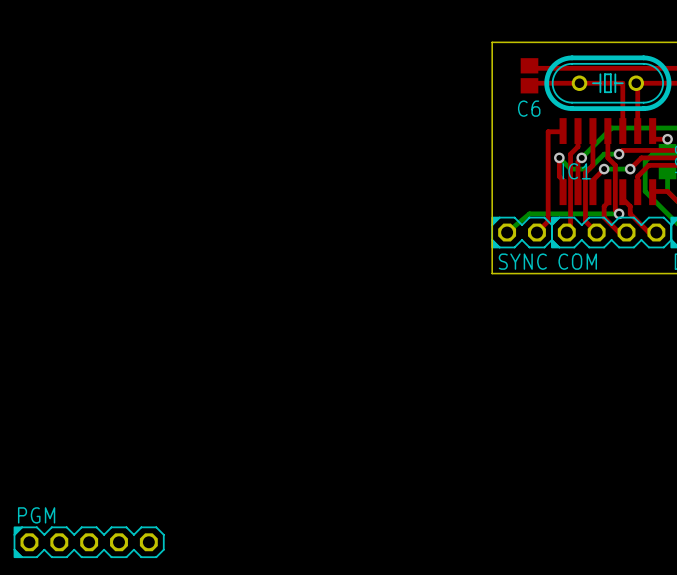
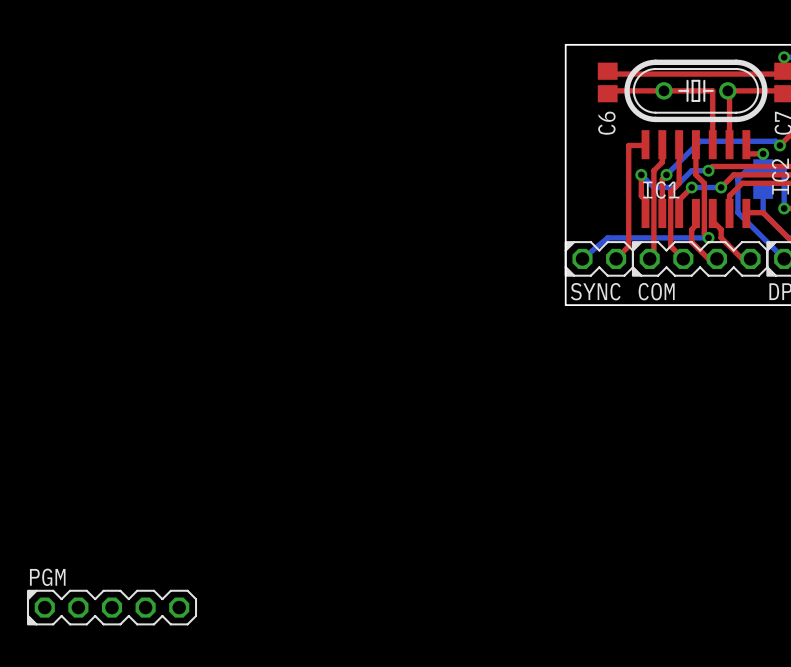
C6 name rotation: 0° (529, 108) -> 90° counterclockwise (606, 123)

